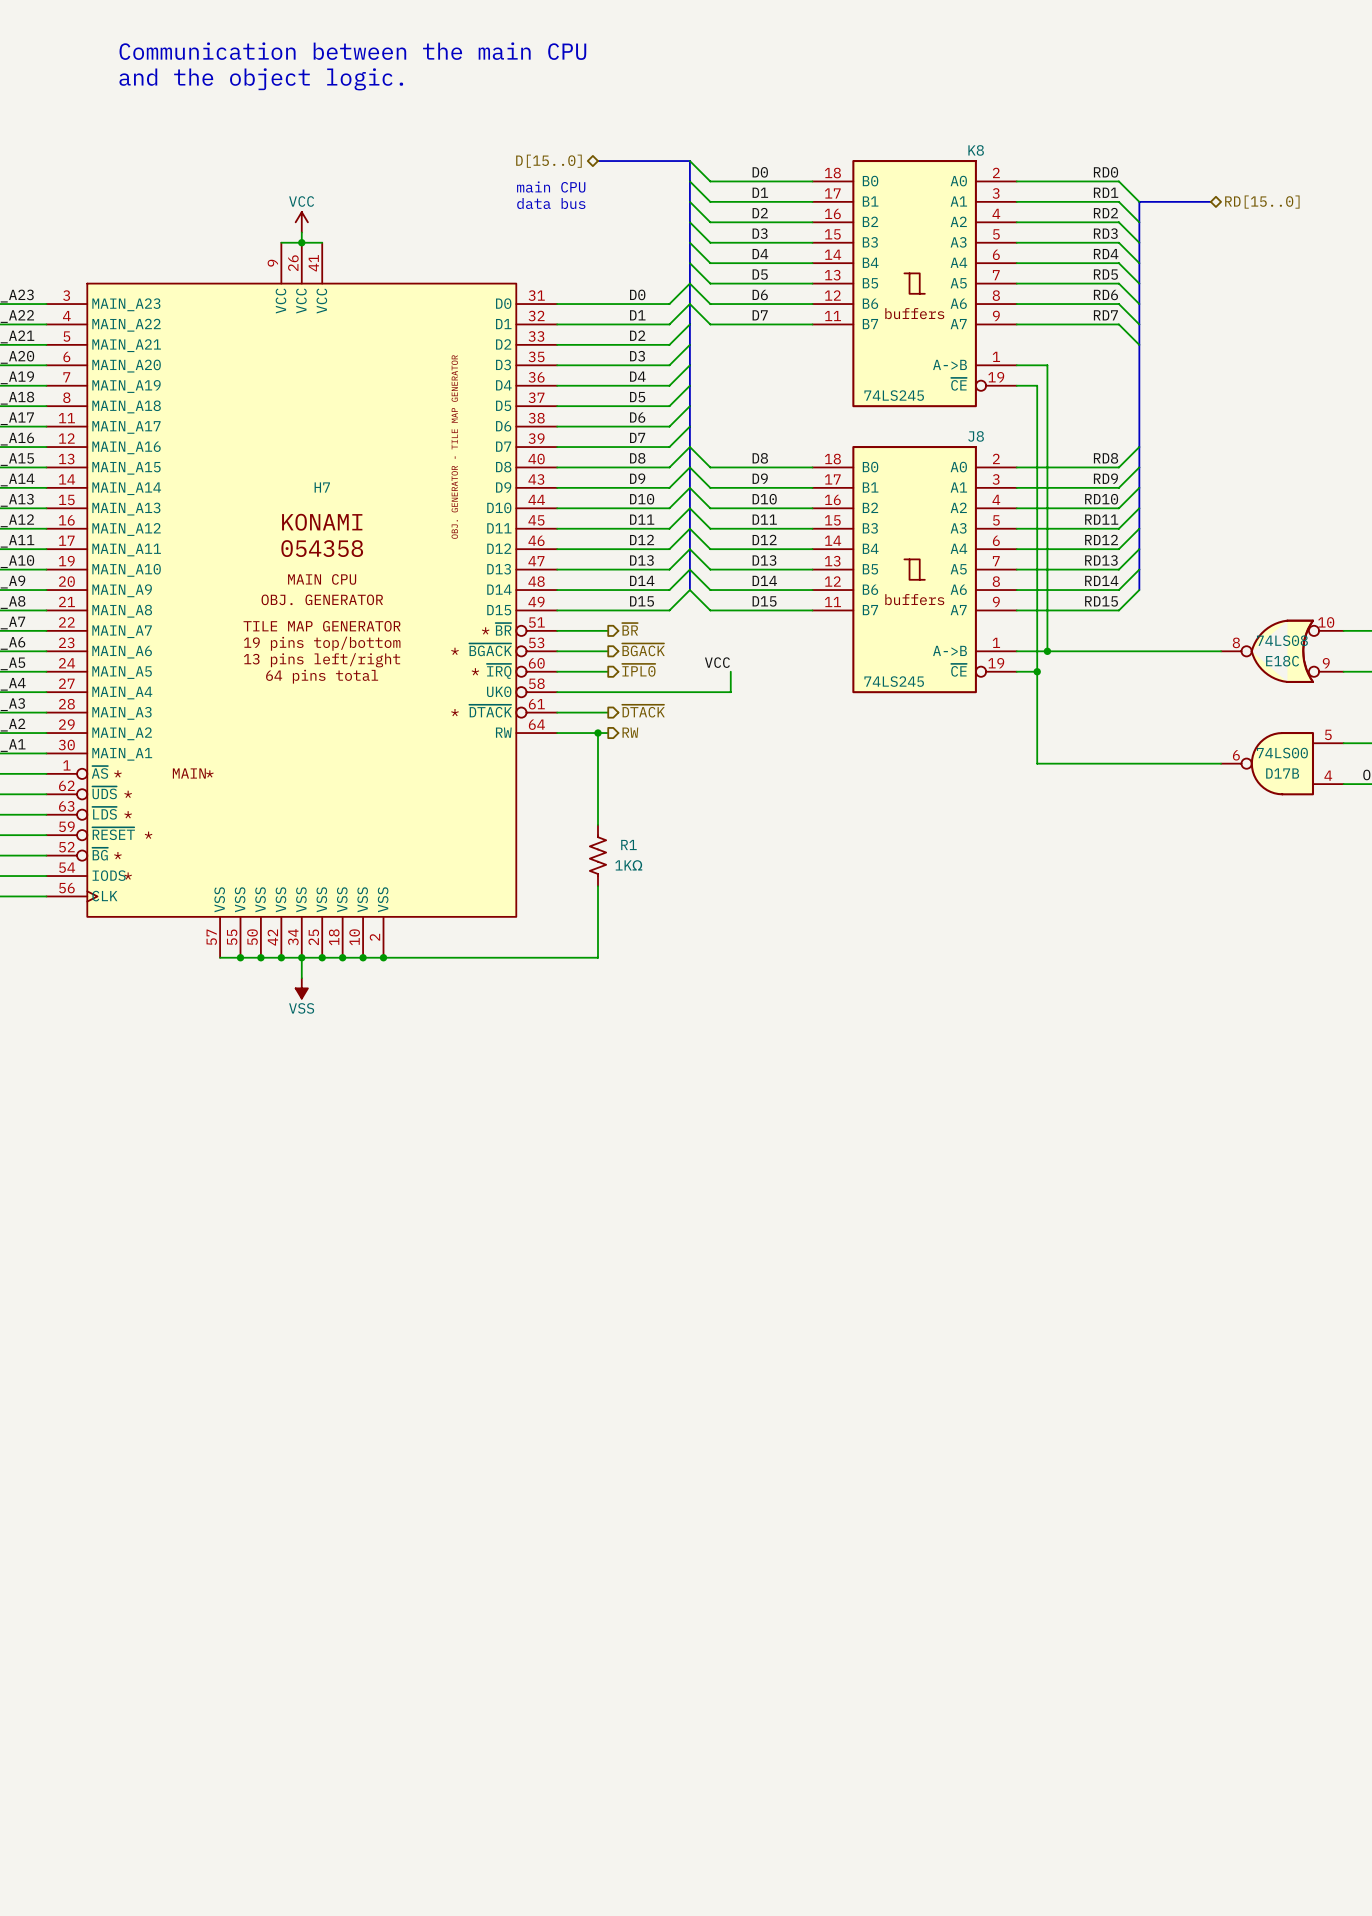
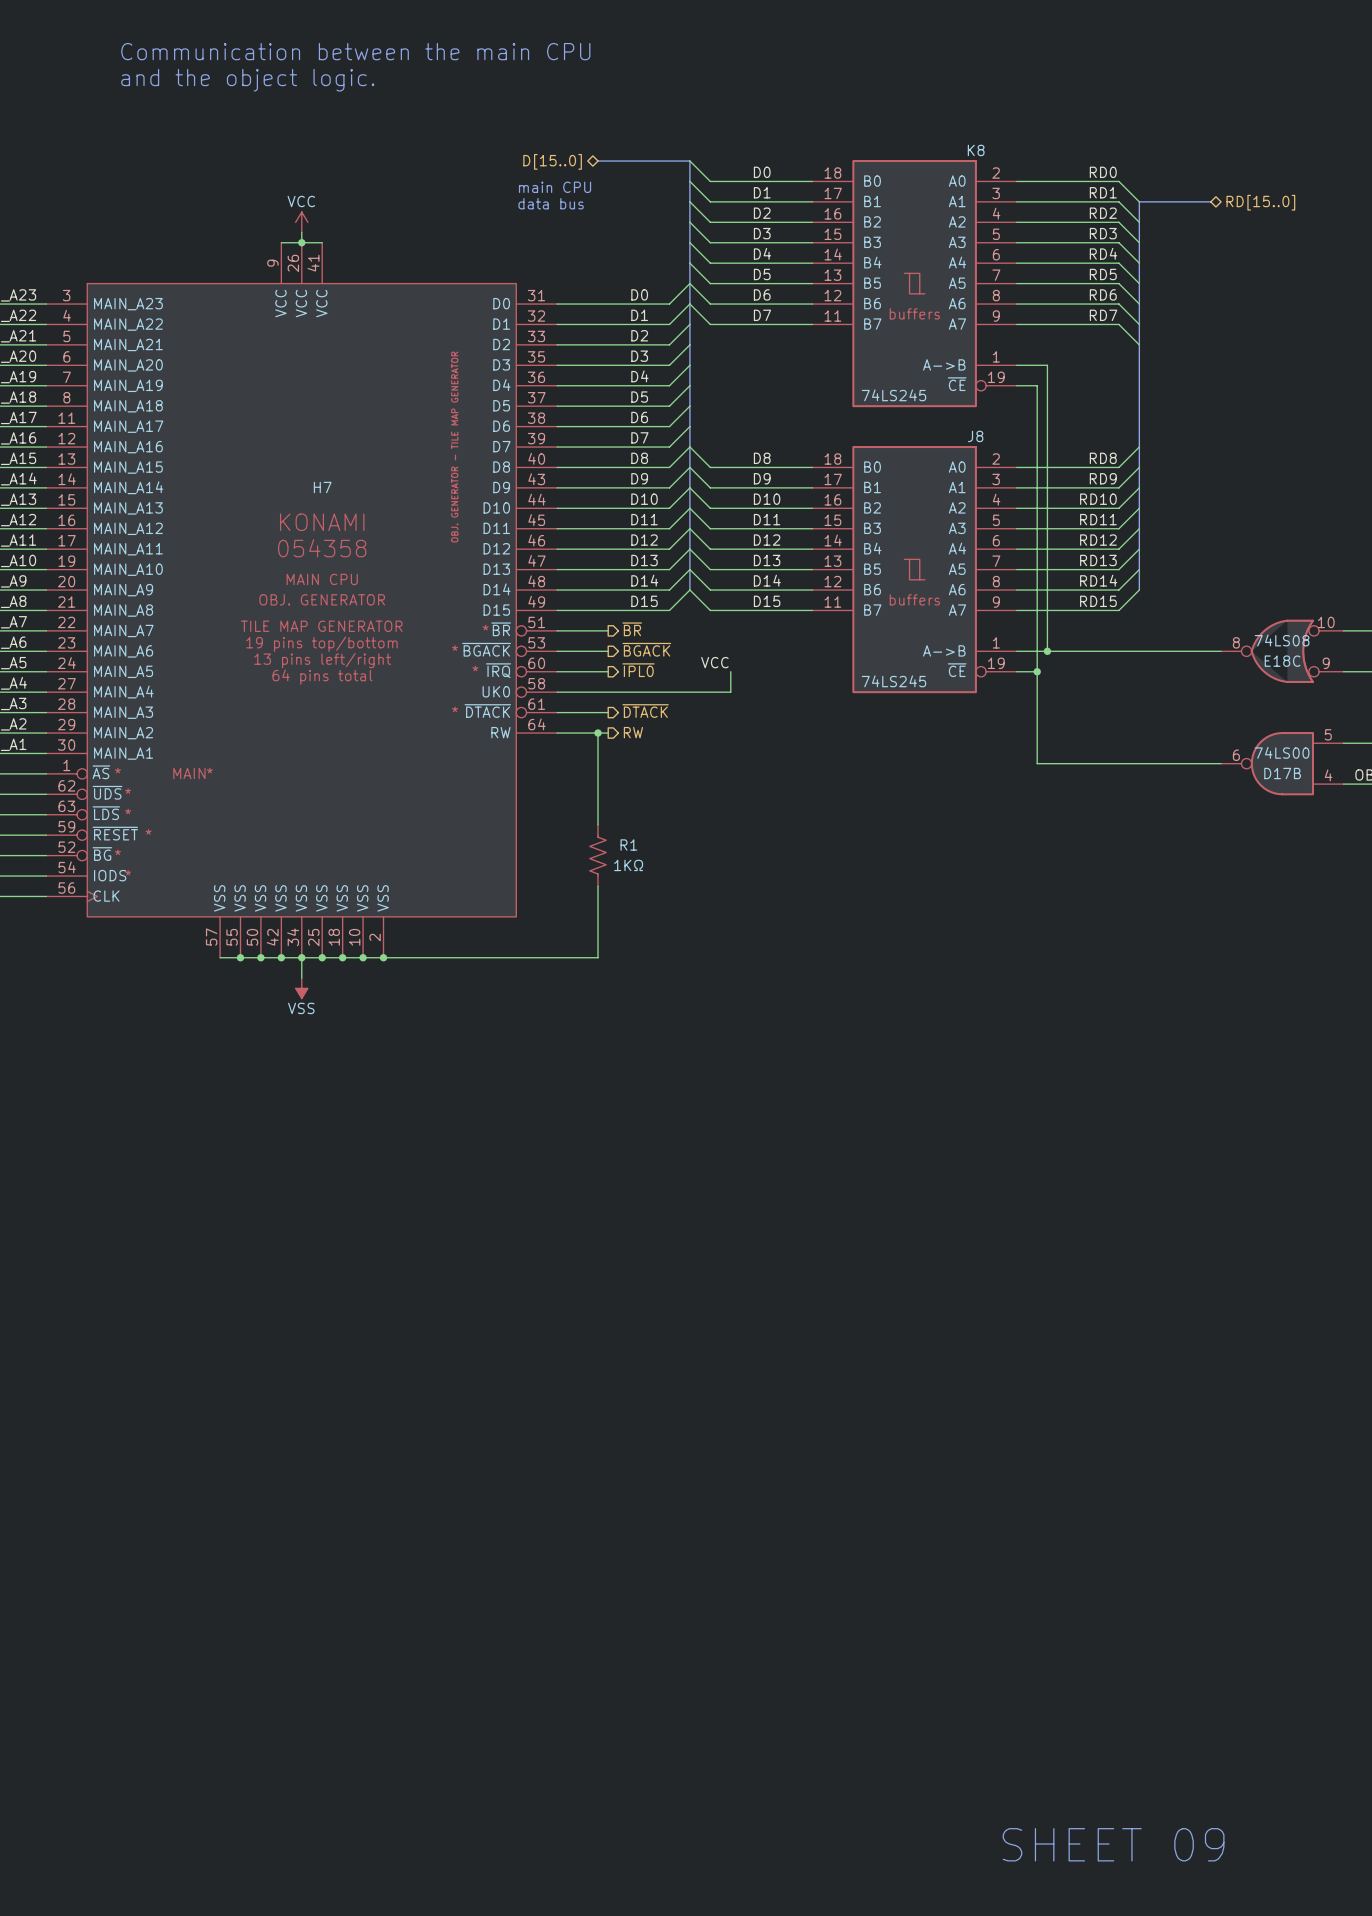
text: none -> SHEET 09 (1113, 1844)

